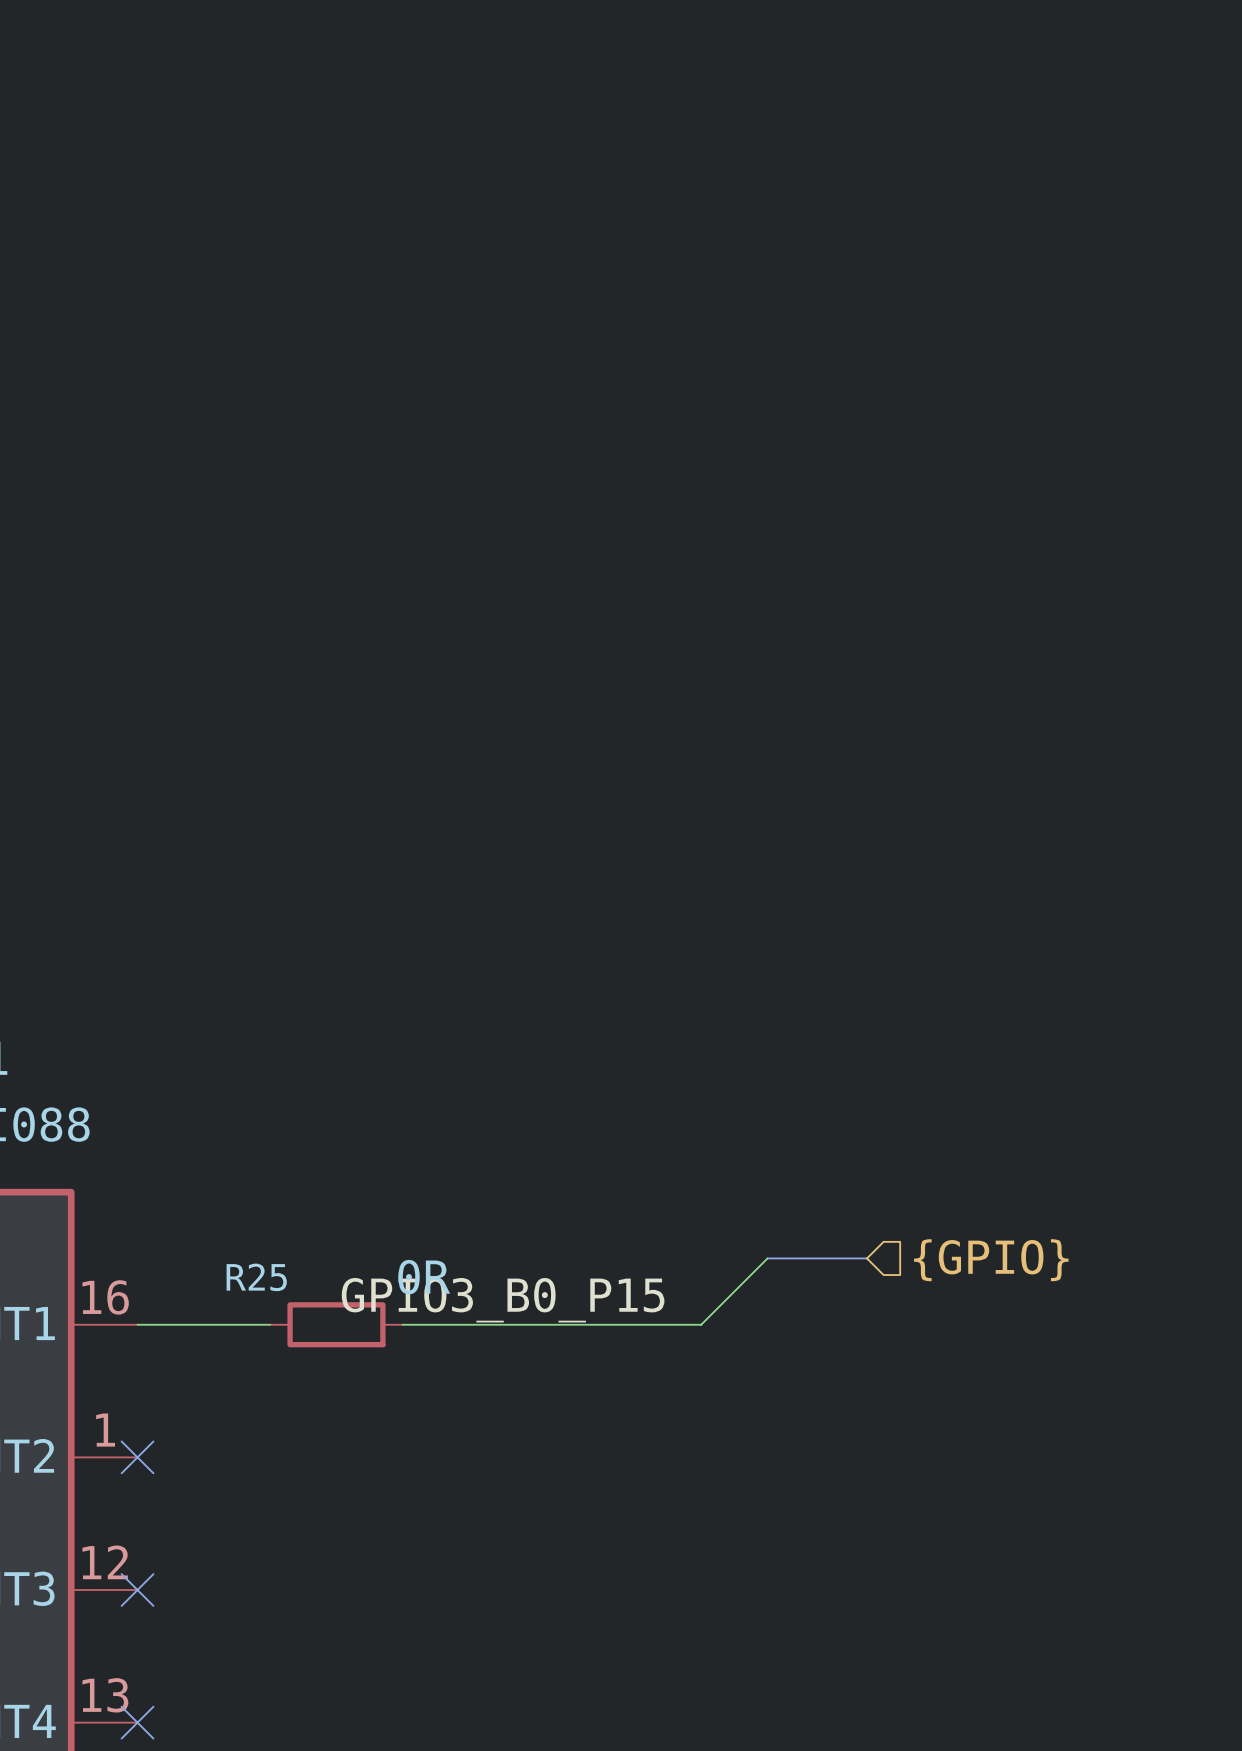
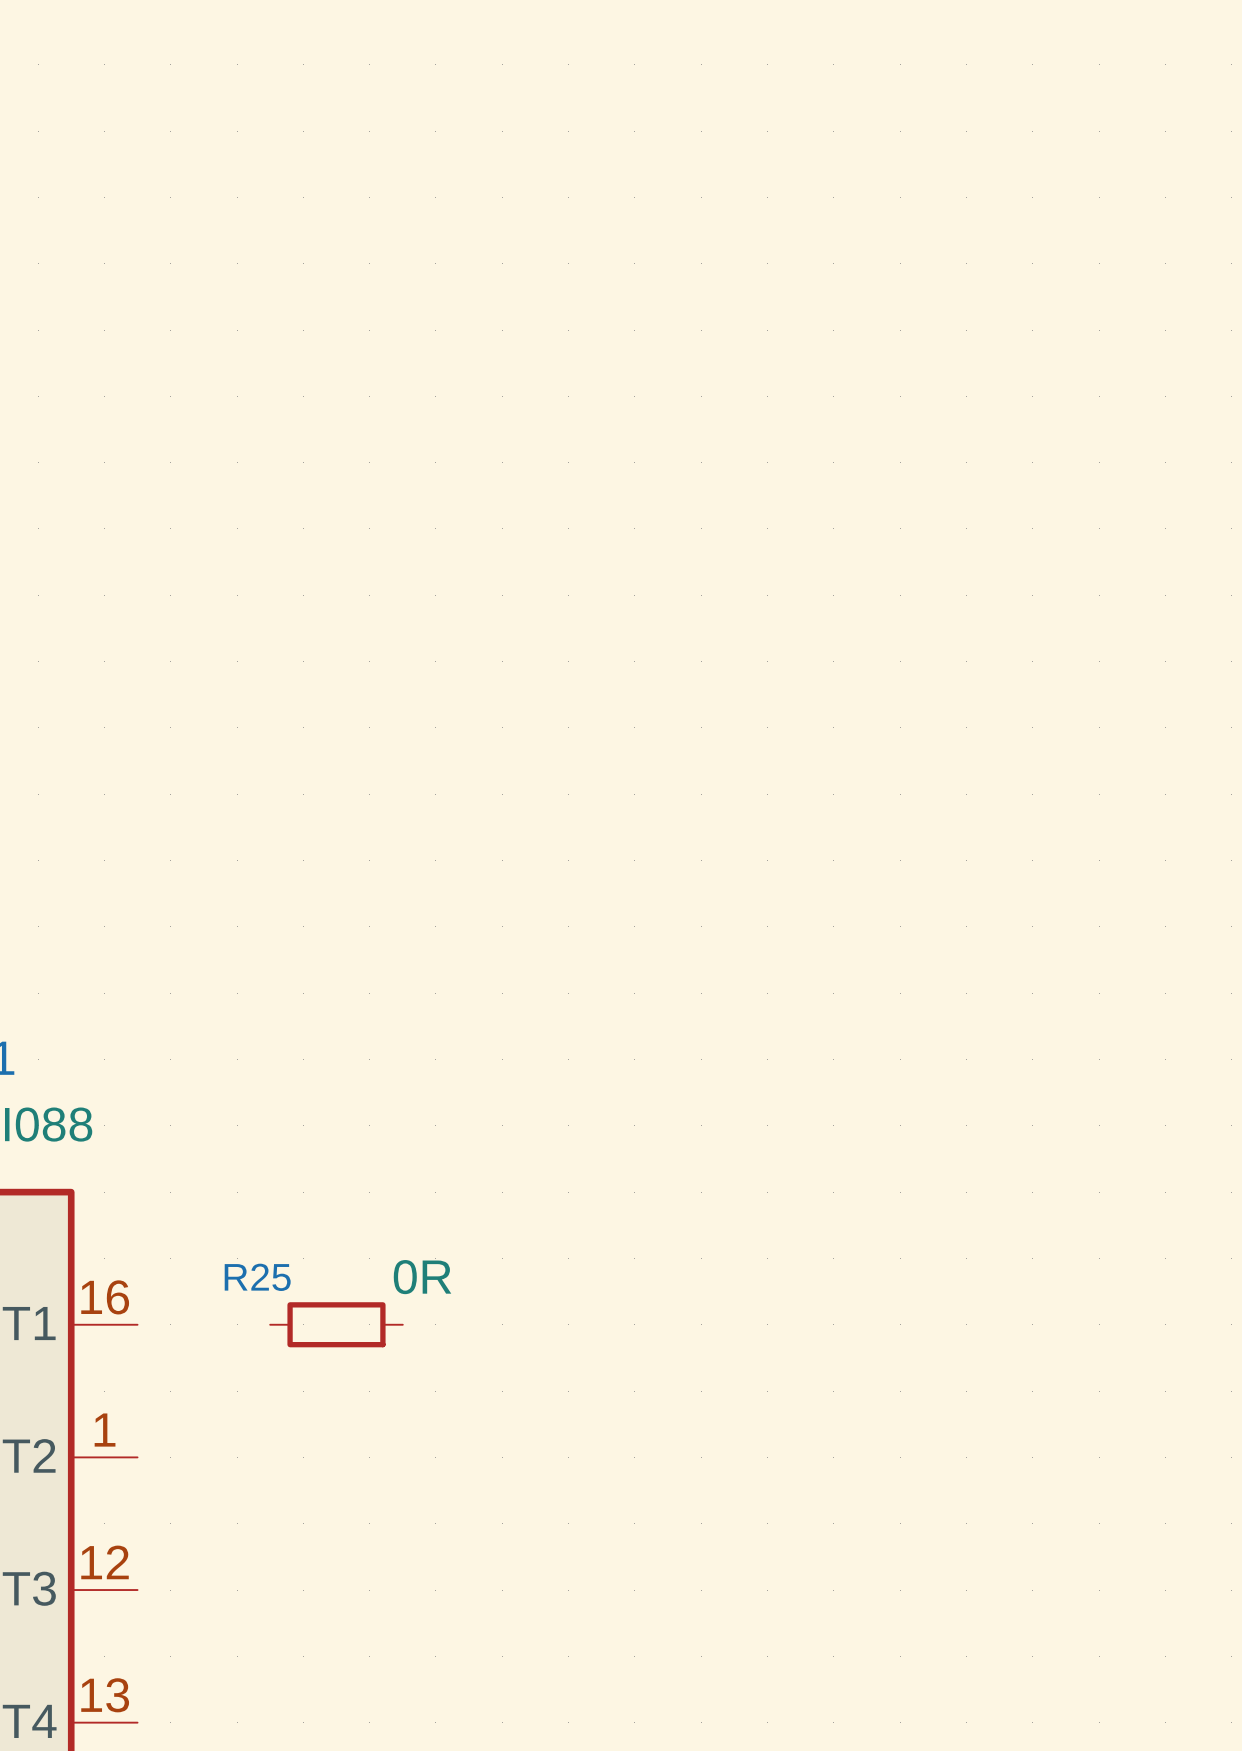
wire: (767, 1258) (701, 1324) (402, 1324) -> none
bus: (767, 1258) (867, 1258) -> none
hierarchical label: {GPIO} (991, 1260) -> none
label: GPIO3_B0_P15 (503, 1300) -> none
wire: (137, 1324) (270, 1324) -> none
no-connect mark: (137, 1457) -> none
no-connect mark: (137, 1590) -> none
no-connect mark: (137, 1722) -> none

